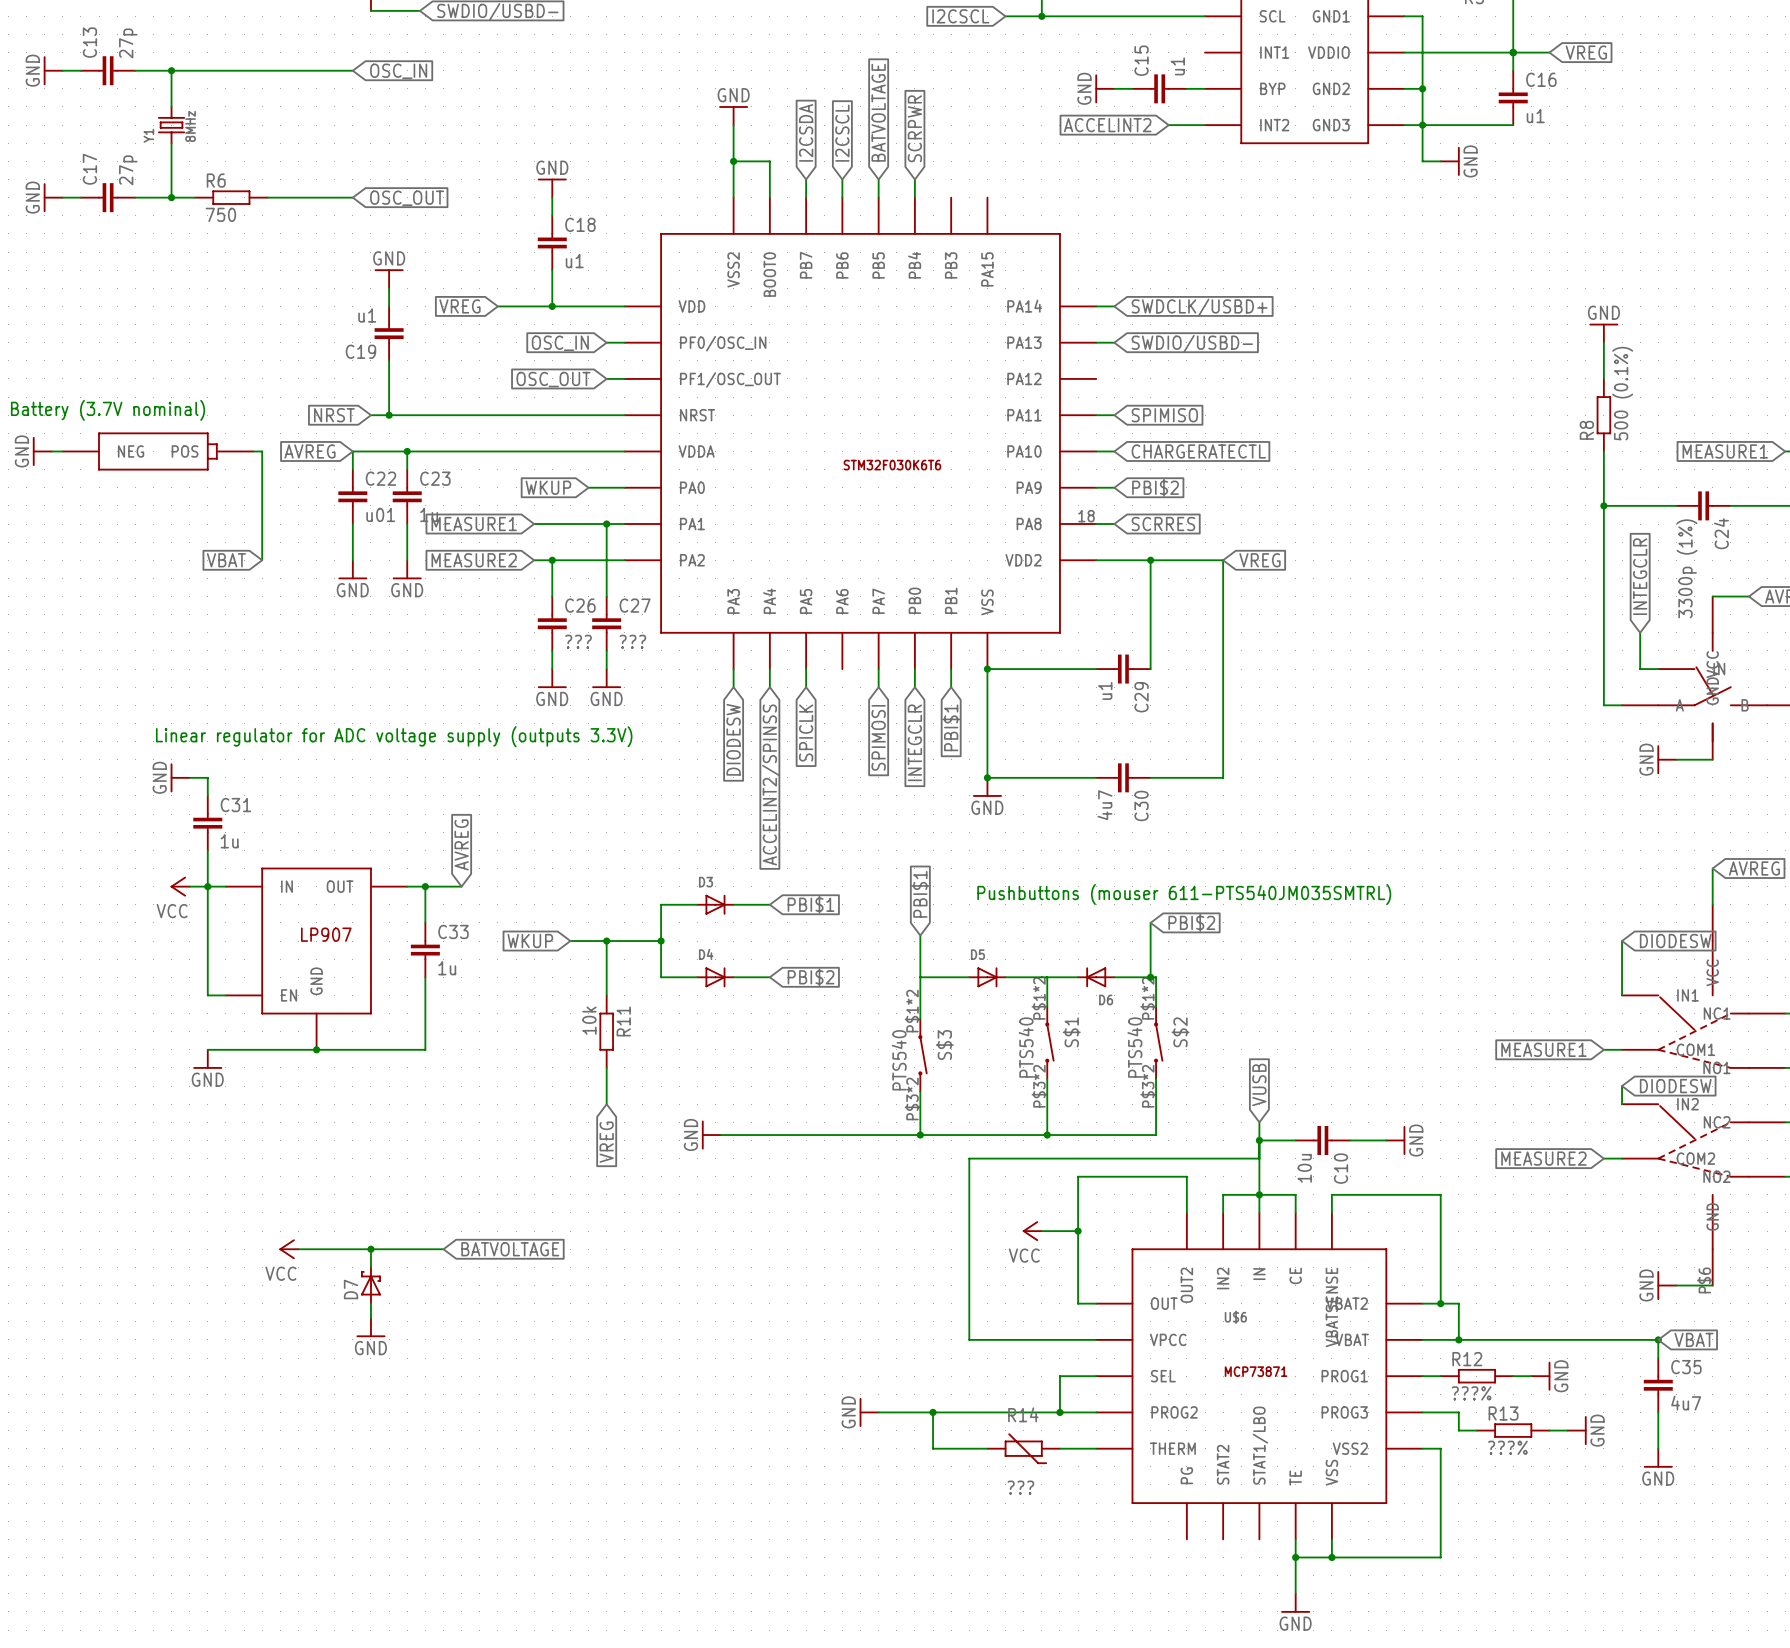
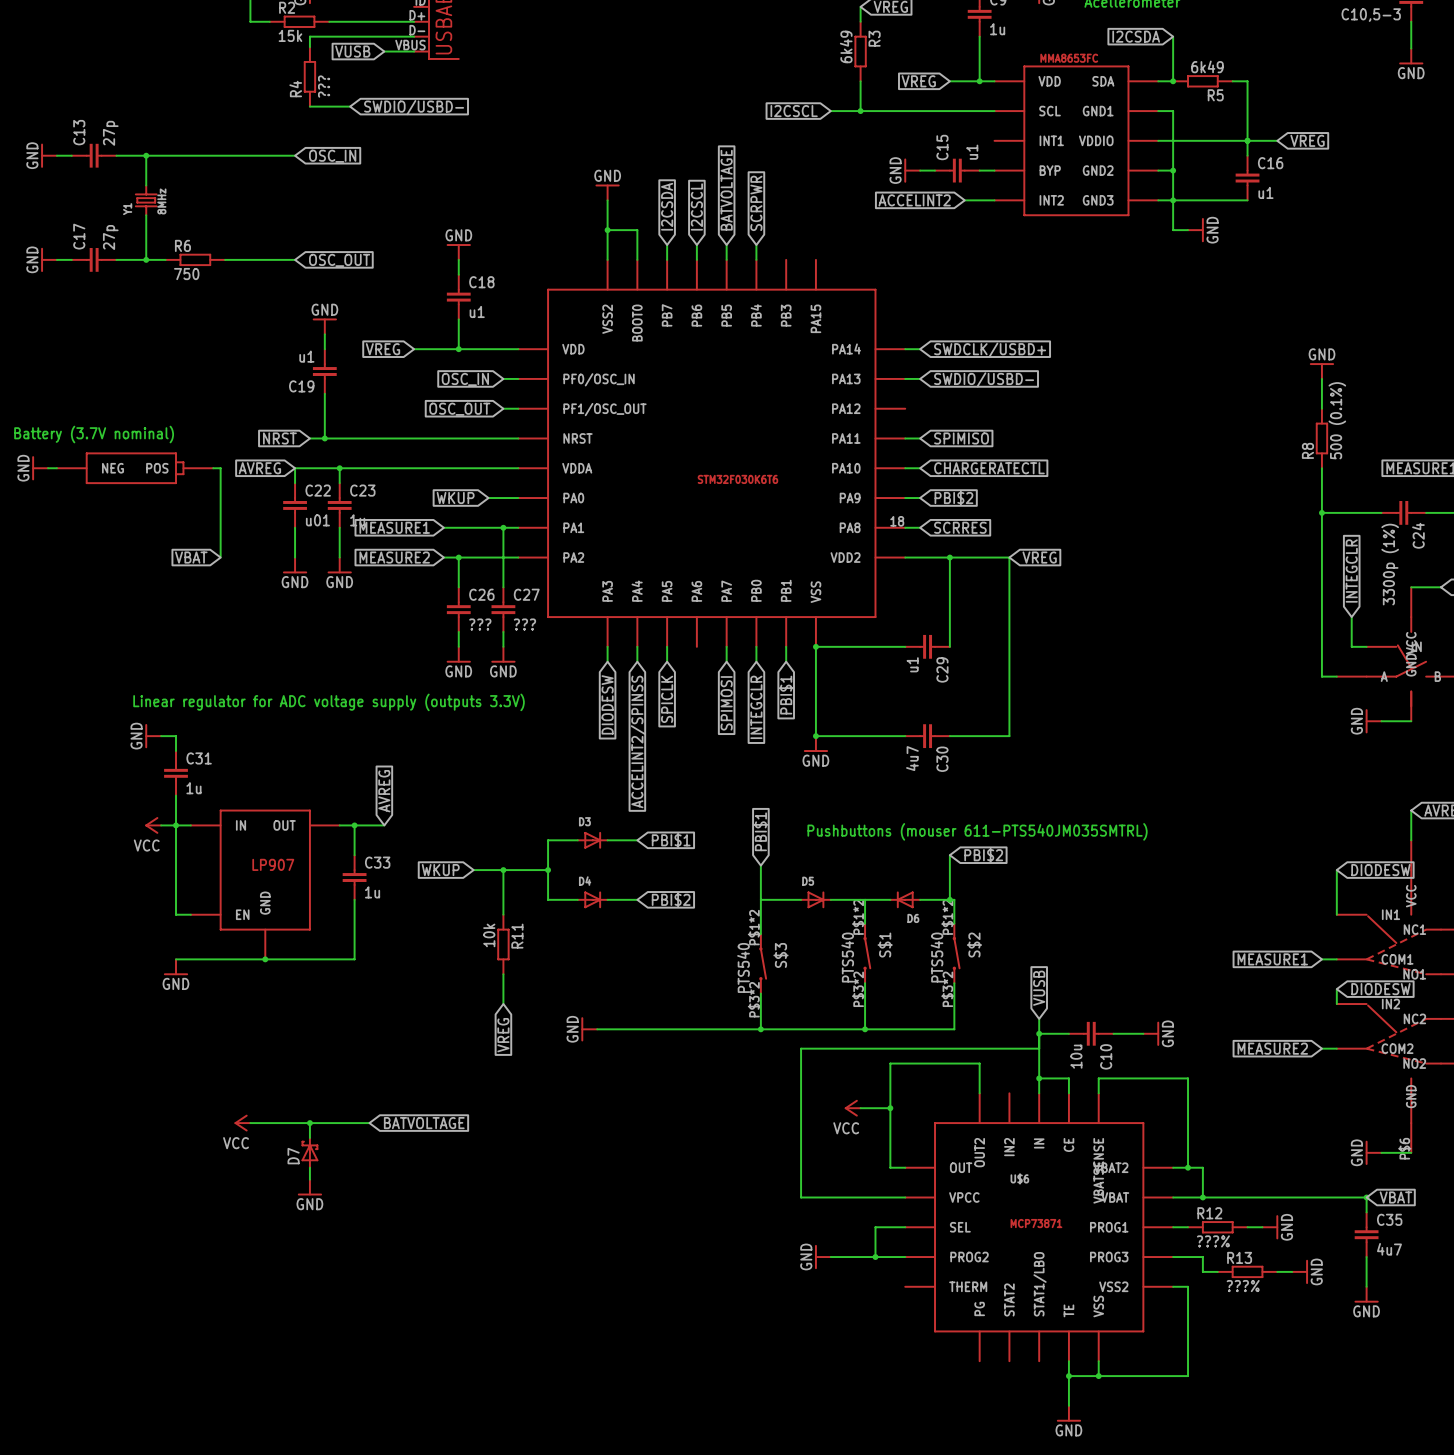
wire: (1259, 1194) (1223, 1194) (1223, 1212) -> none
power symbol position: GND (869, 1412) -> GND (823, 1257)
wire: (878, 1412) (1005, 1412) -> none
wire: (933, 1412) (933, 1448) (987, 1448) -> none
junction: (933, 1412) -> none
R14: ??? (1023, 1448) -> none
wire: (1059, 1448) (1096, 1448) -> none

